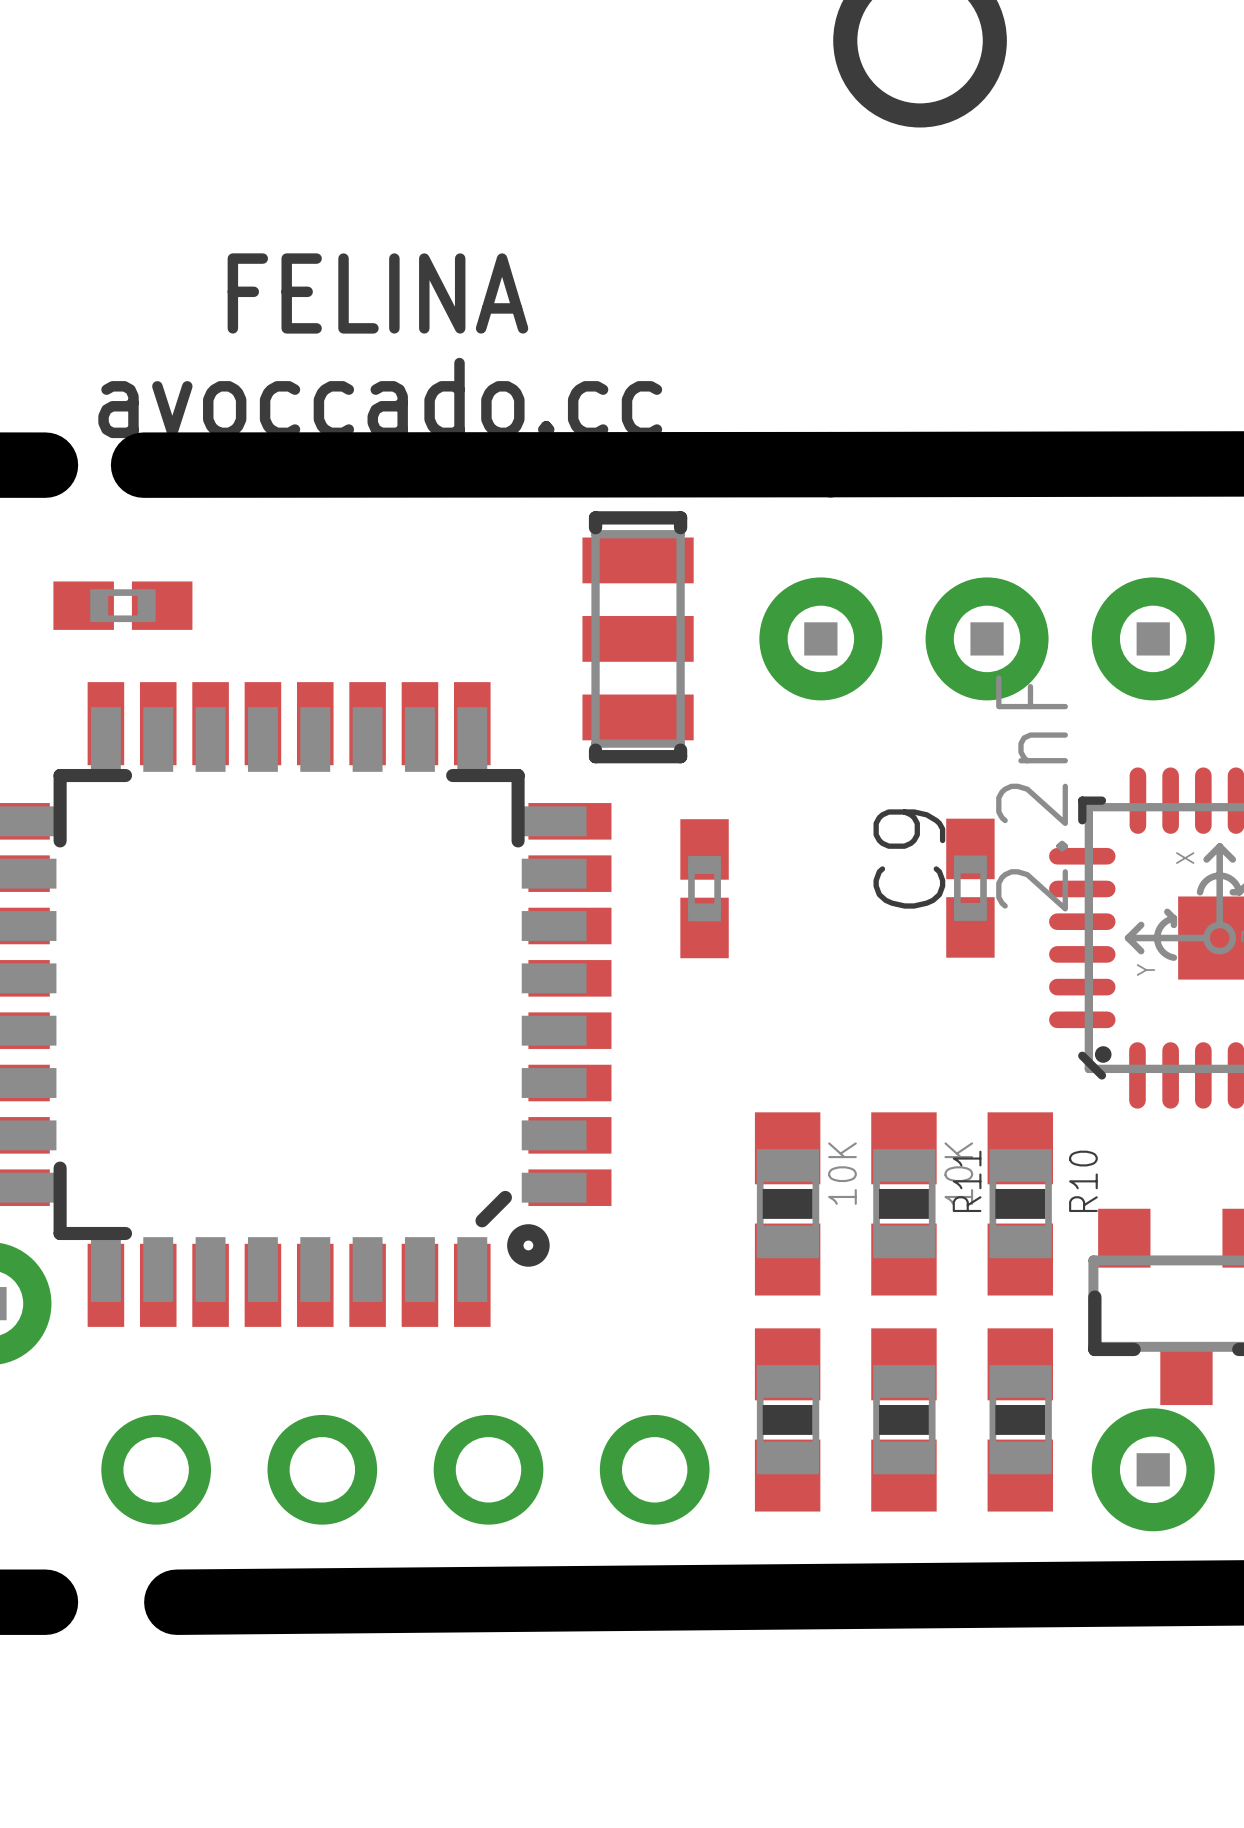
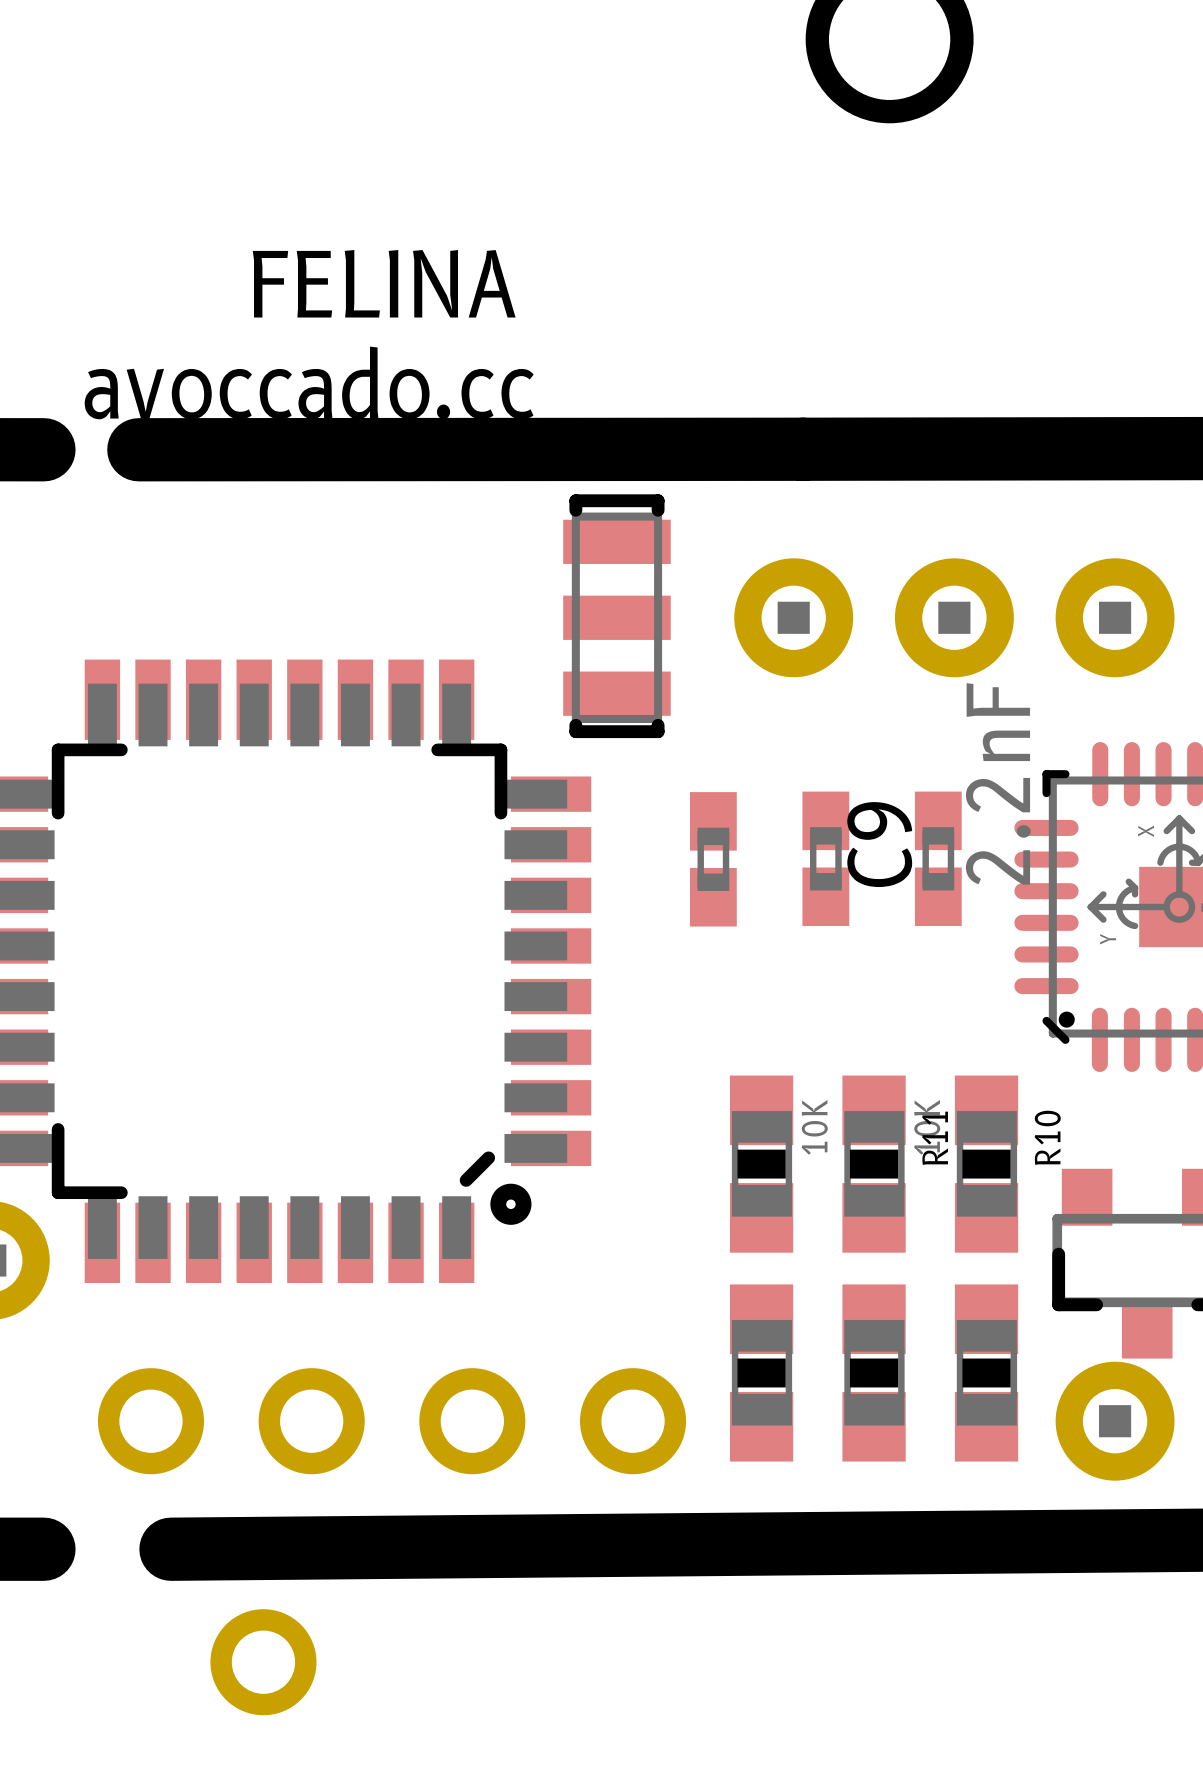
part rotation: 0° (122, 605) -> 90° clockwise (825, 858)
part position: (122, 605) -> (825, 858)
part position: (704, 888) -> (713, 859)
part: none -> (263, 1662)

